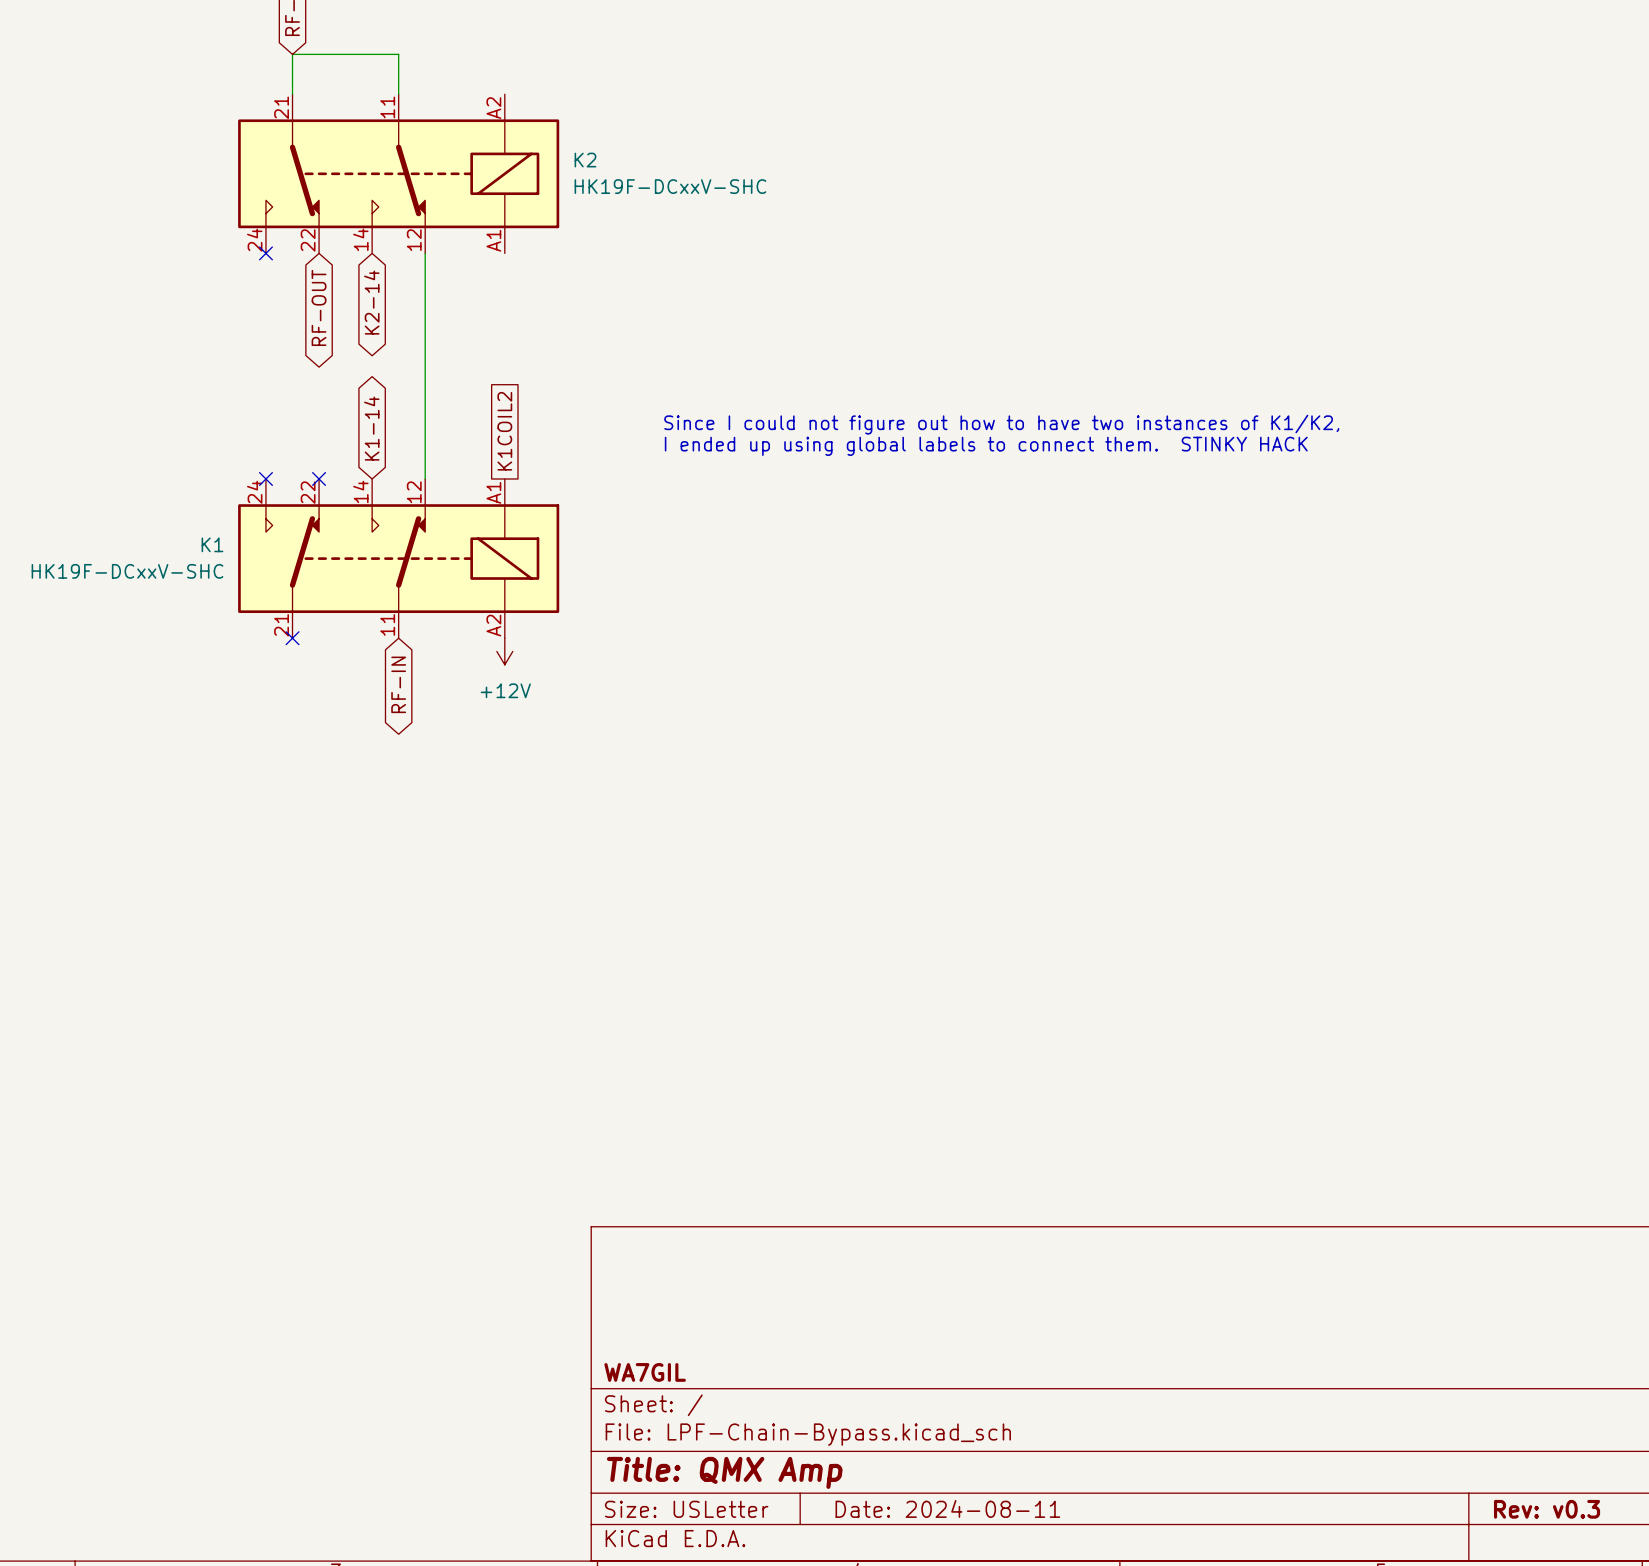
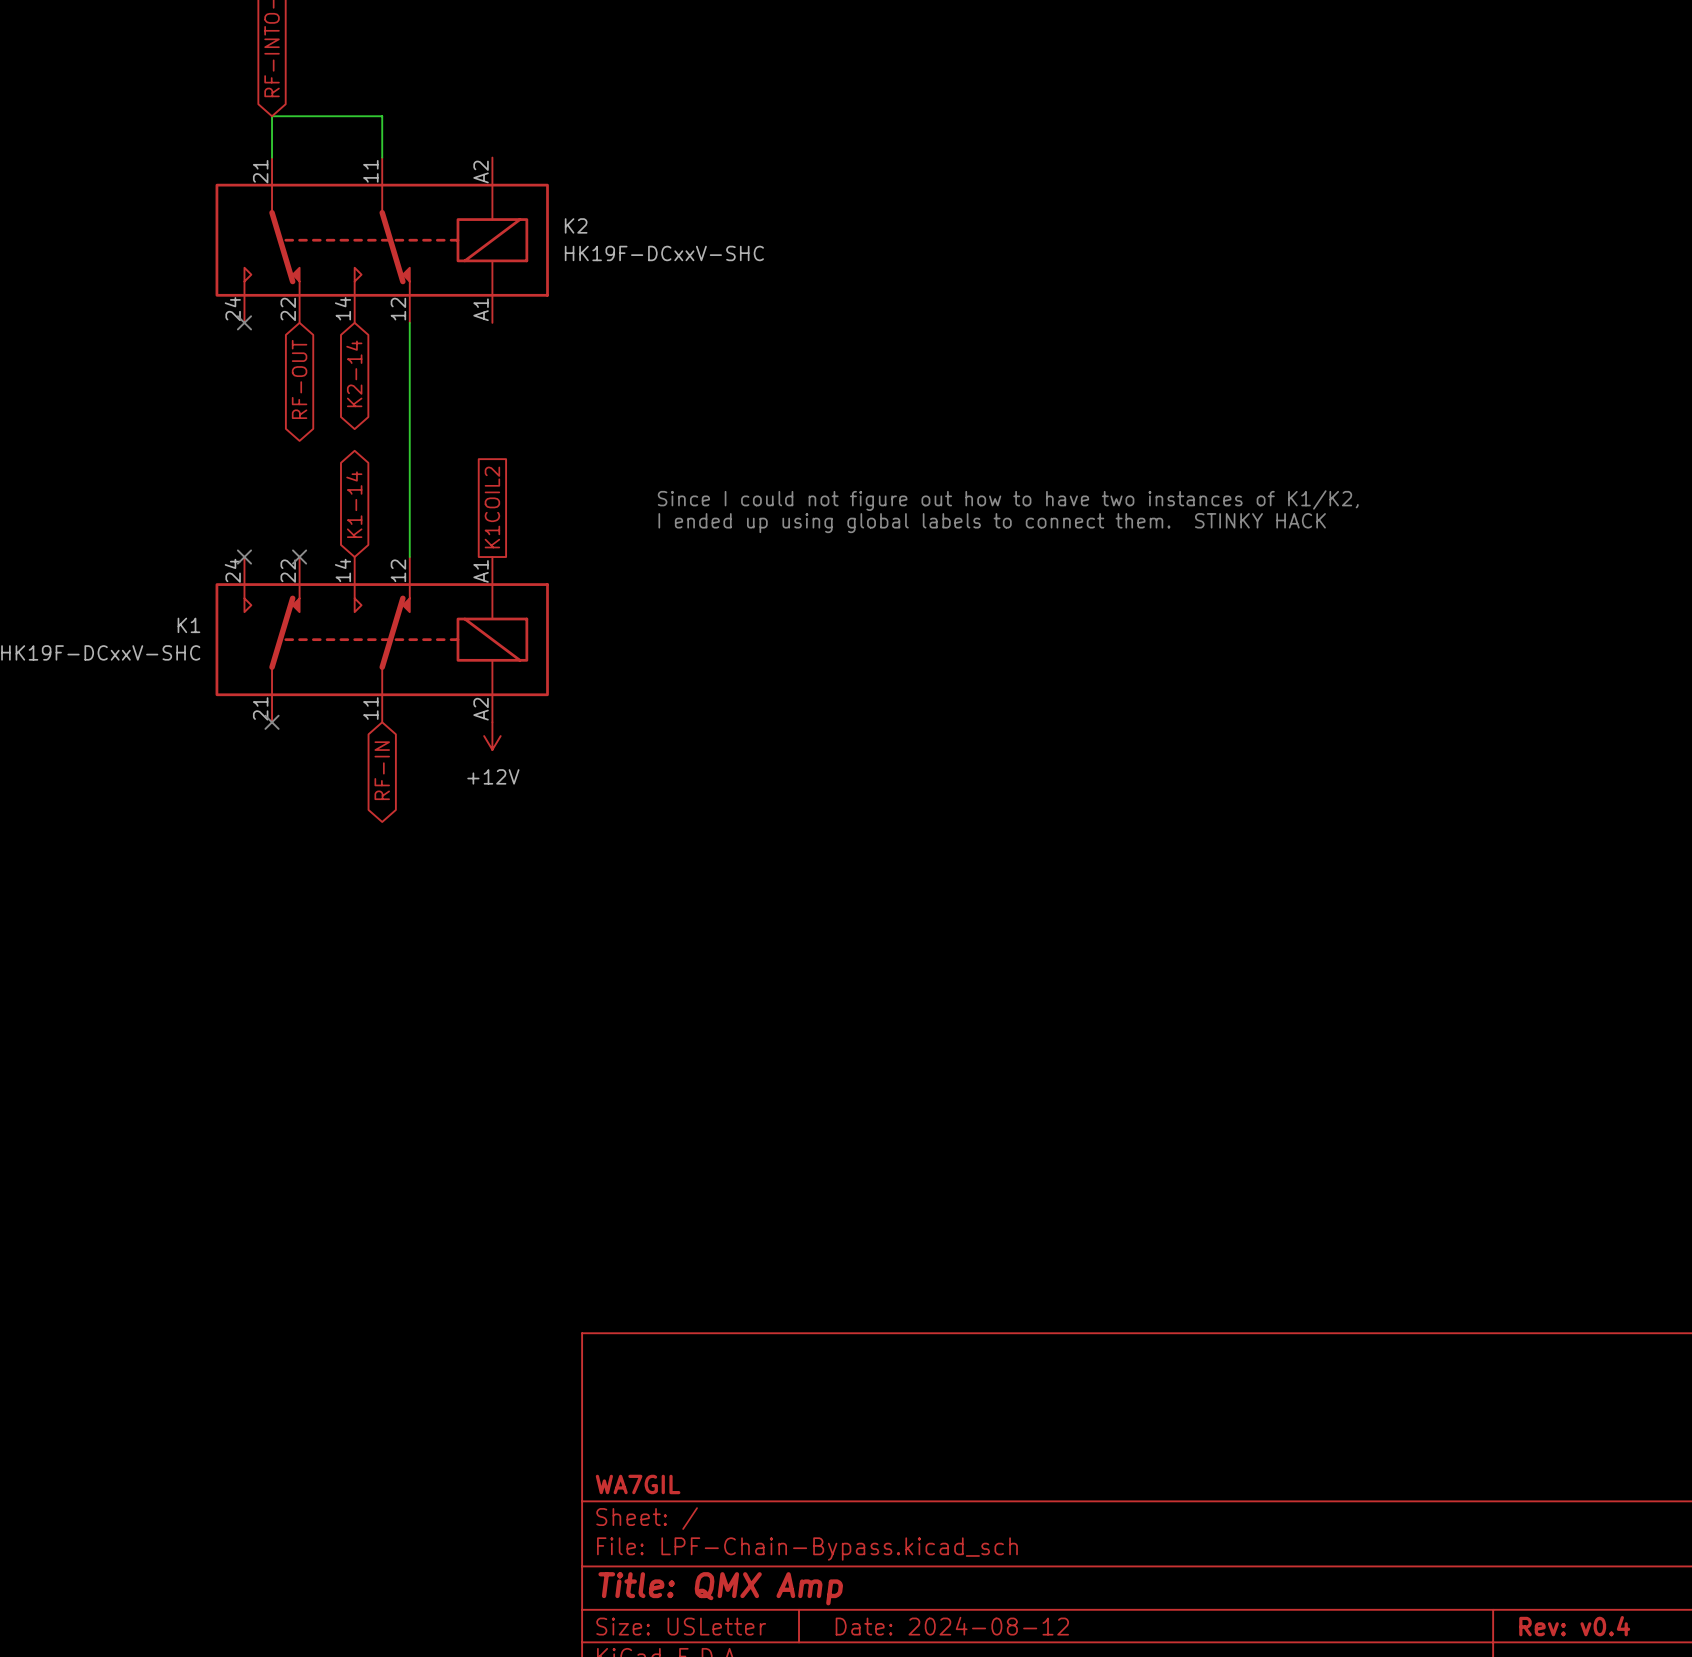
title block: Date: 2024-08-11 (947, 1508) -> Date: 2024-08-12 (952, 1626)
title block: Rev: v0.3 (1547, 1509) -> Rev: v0.4 (1574, 1626)

